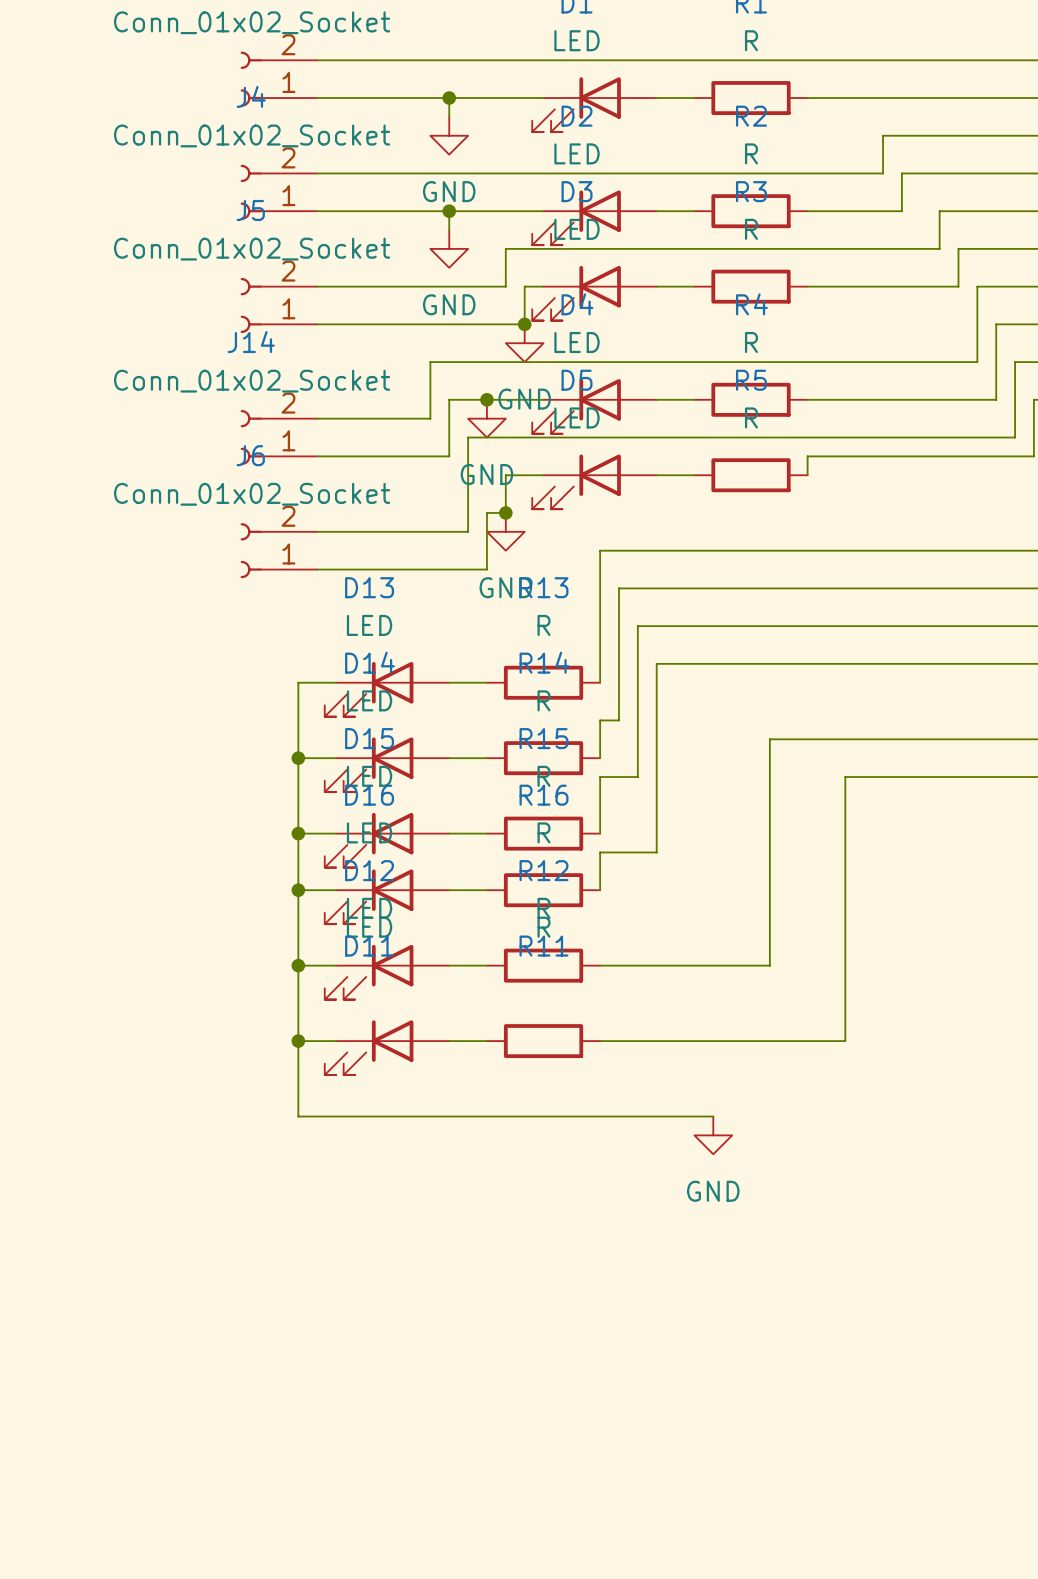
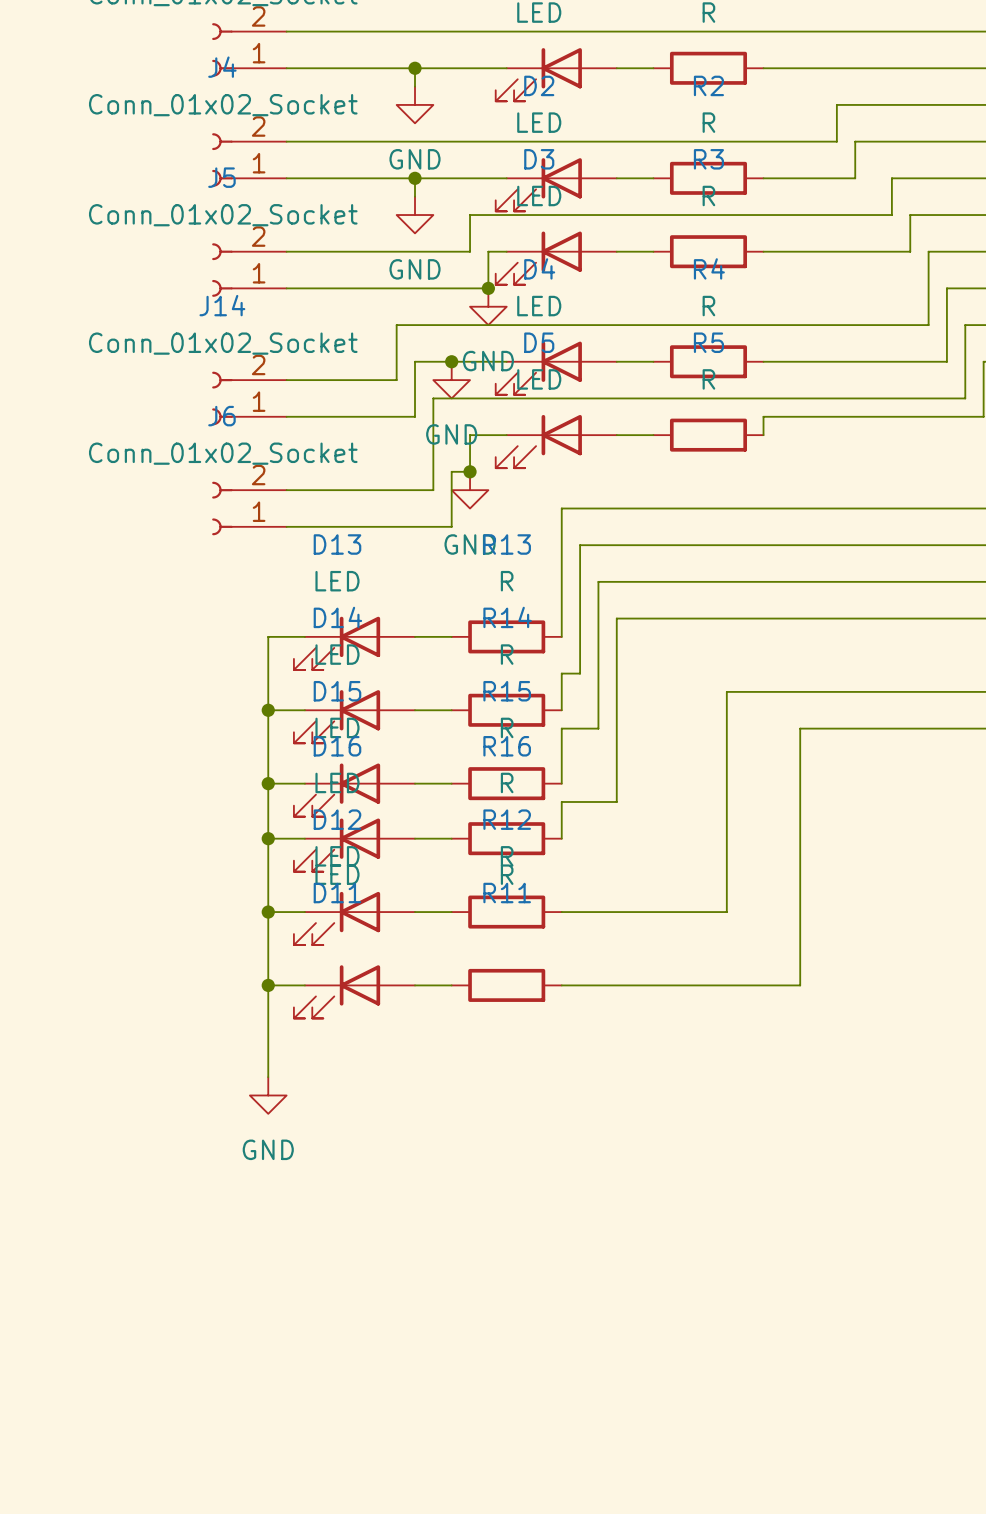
wire: (298, 1116) (713, 1116) -> (268, 1058) (268, 1077)
power symbol: GND (713, 1135) -> none
power symbol: none -> GND (268, 1095)

